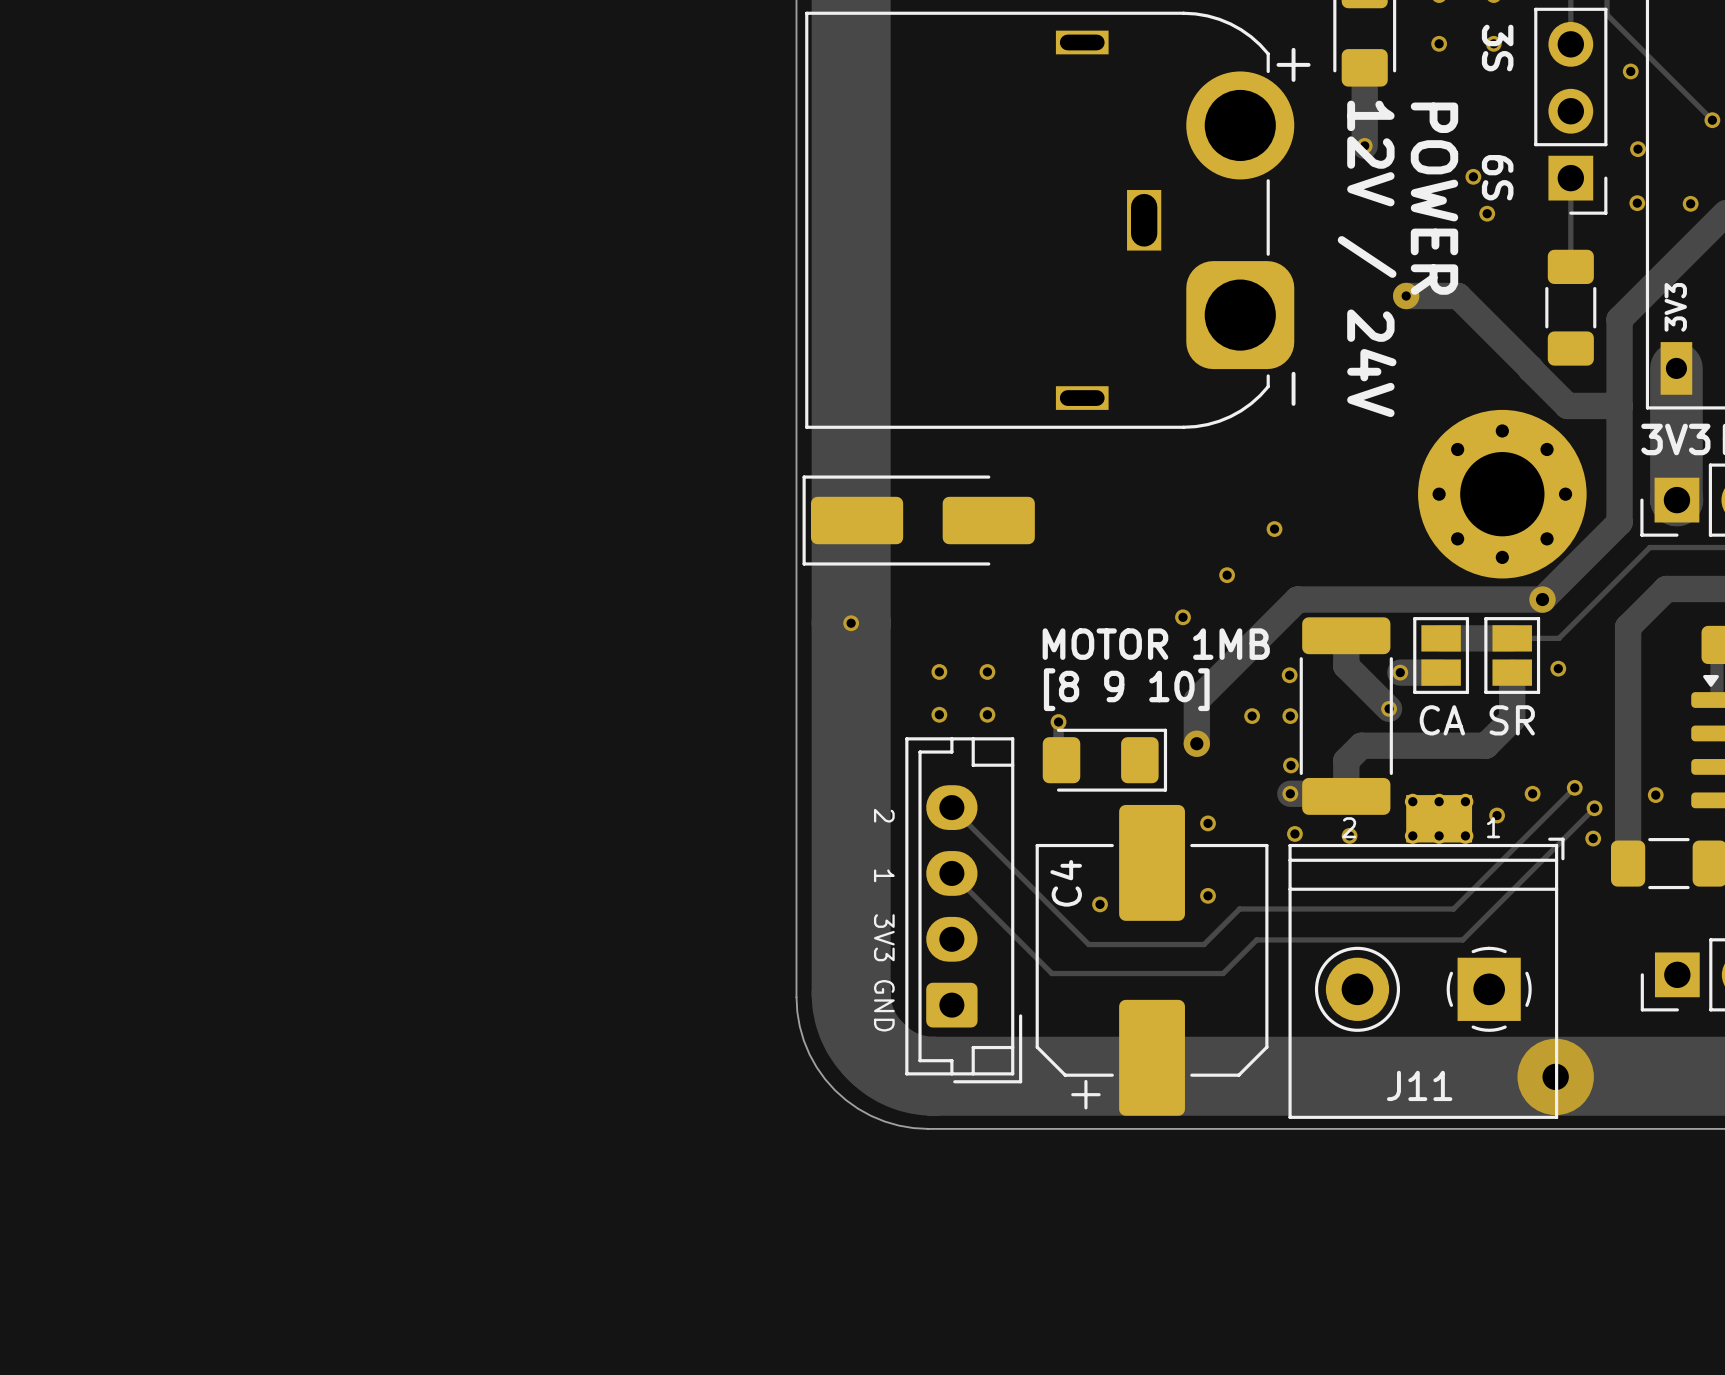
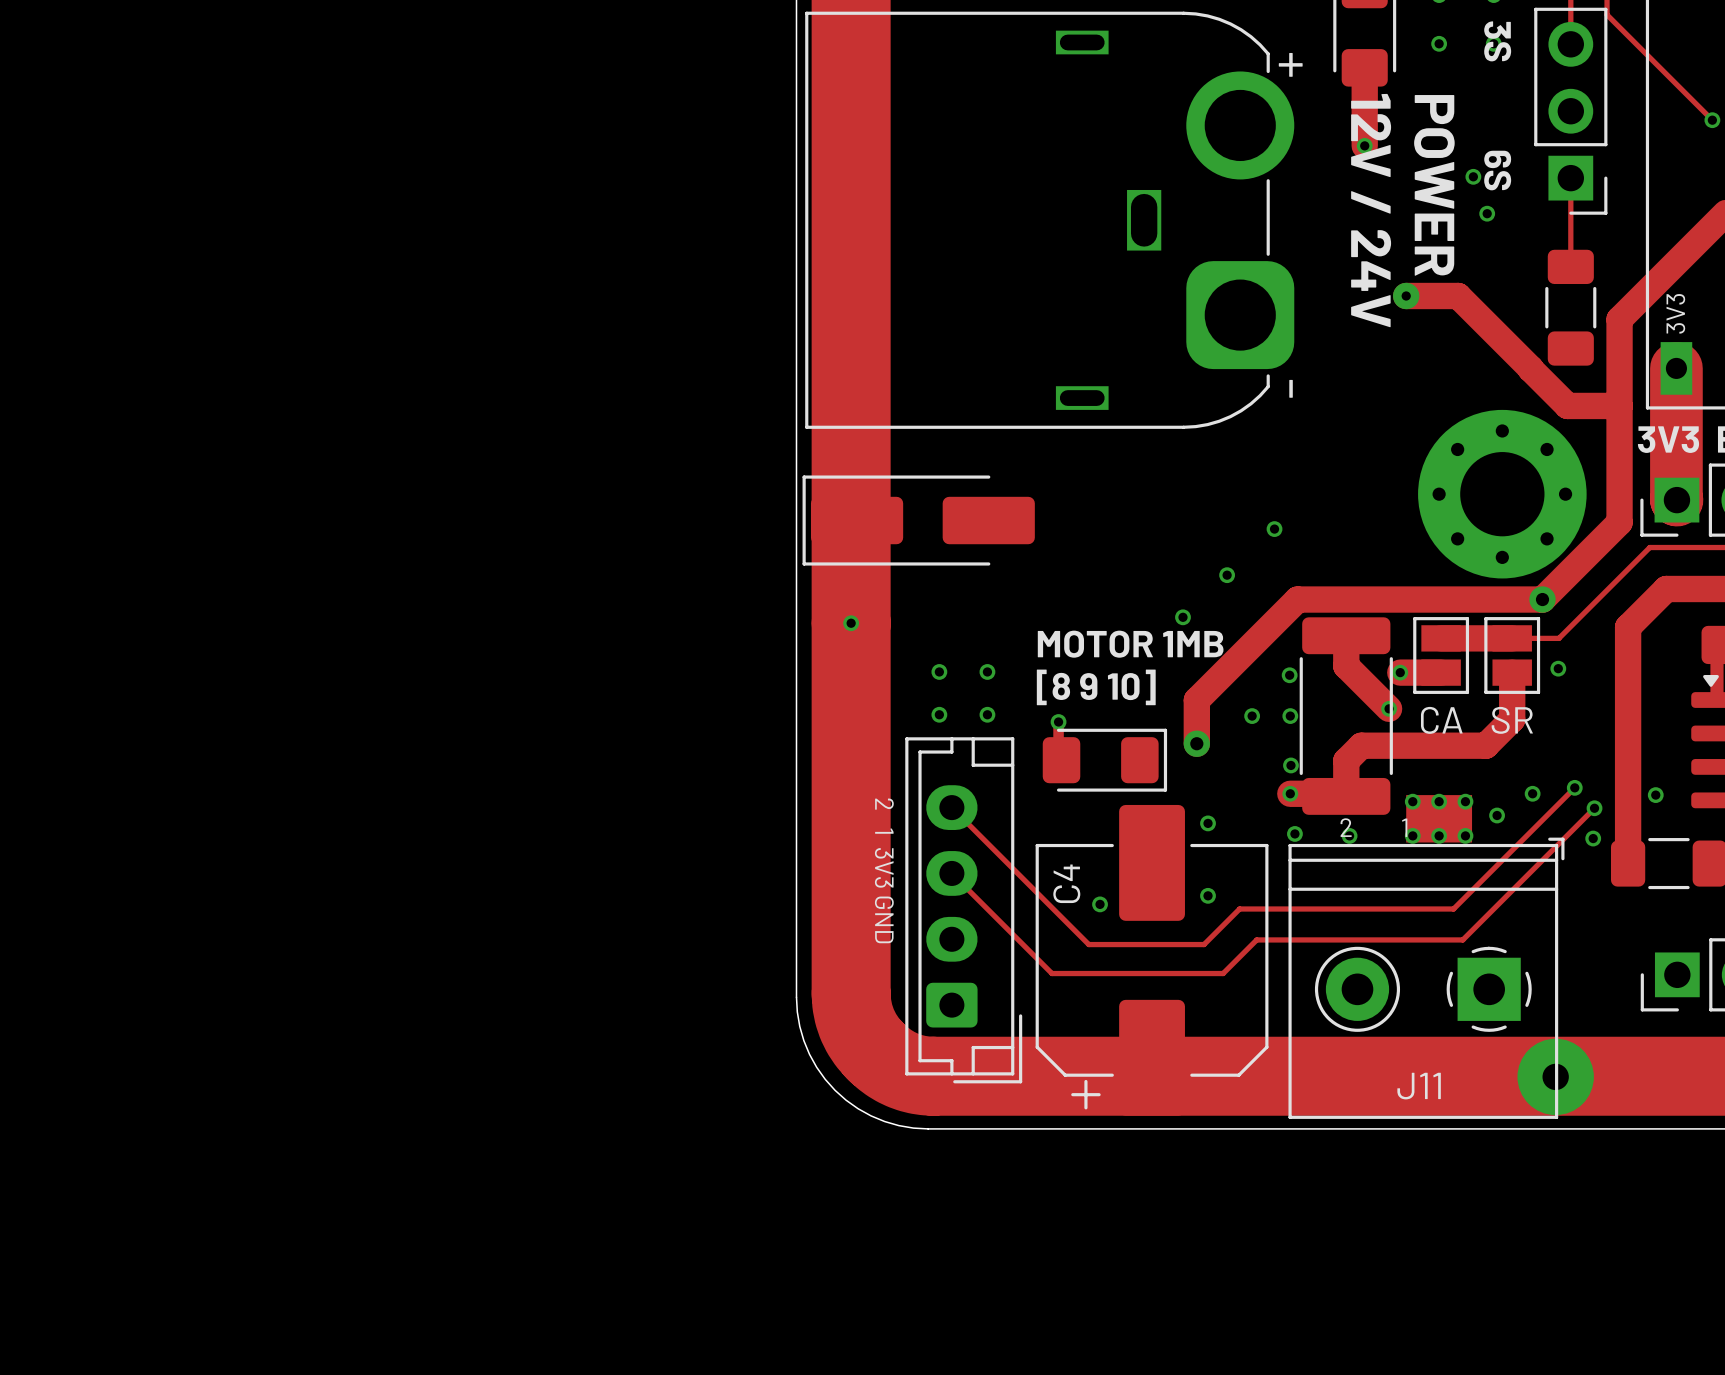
via: (1630, 71) -> none
via: (1637, 149) -> none
via: (1637, 203) -> none
via: (1690, 203) -> none

